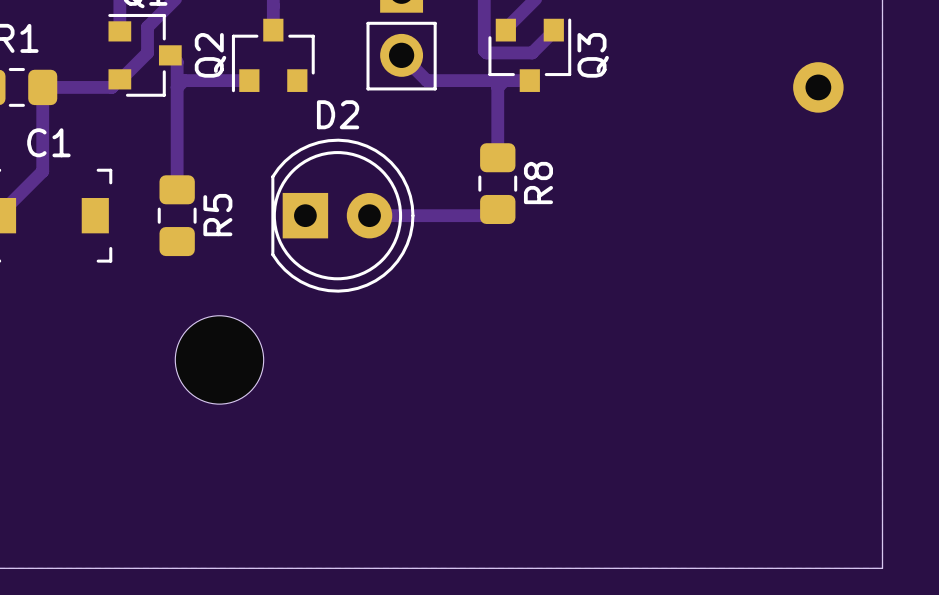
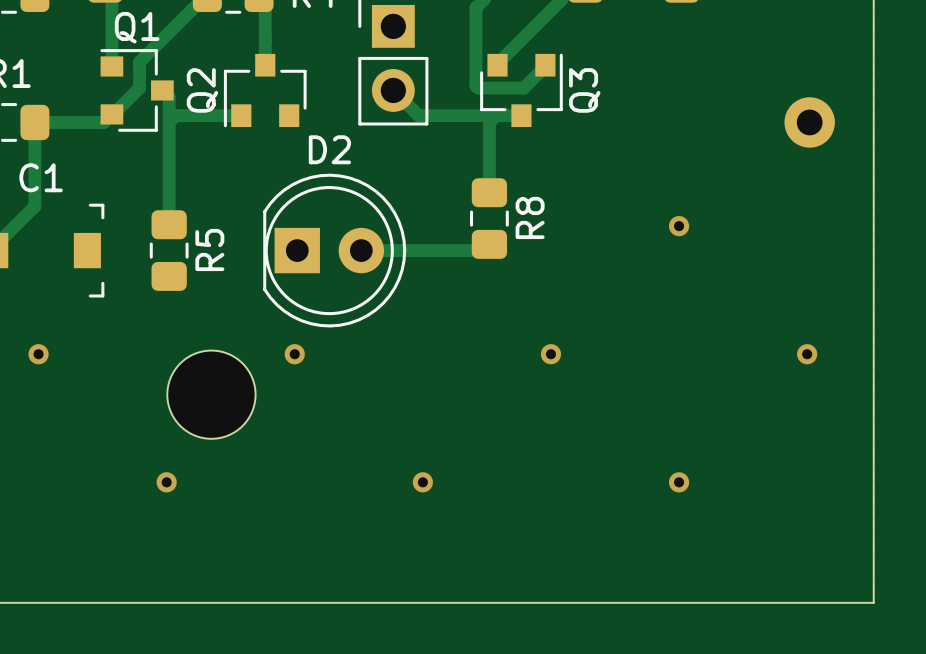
via: none -> (679, 226)
via: none -> (38, 354)
via: none -> (294, 354)
via: none -> (550, 354)
via: none -> (807, 354)
via: none -> (166, 482)
via: none -> (422, 482)
via: none -> (679, 482)

